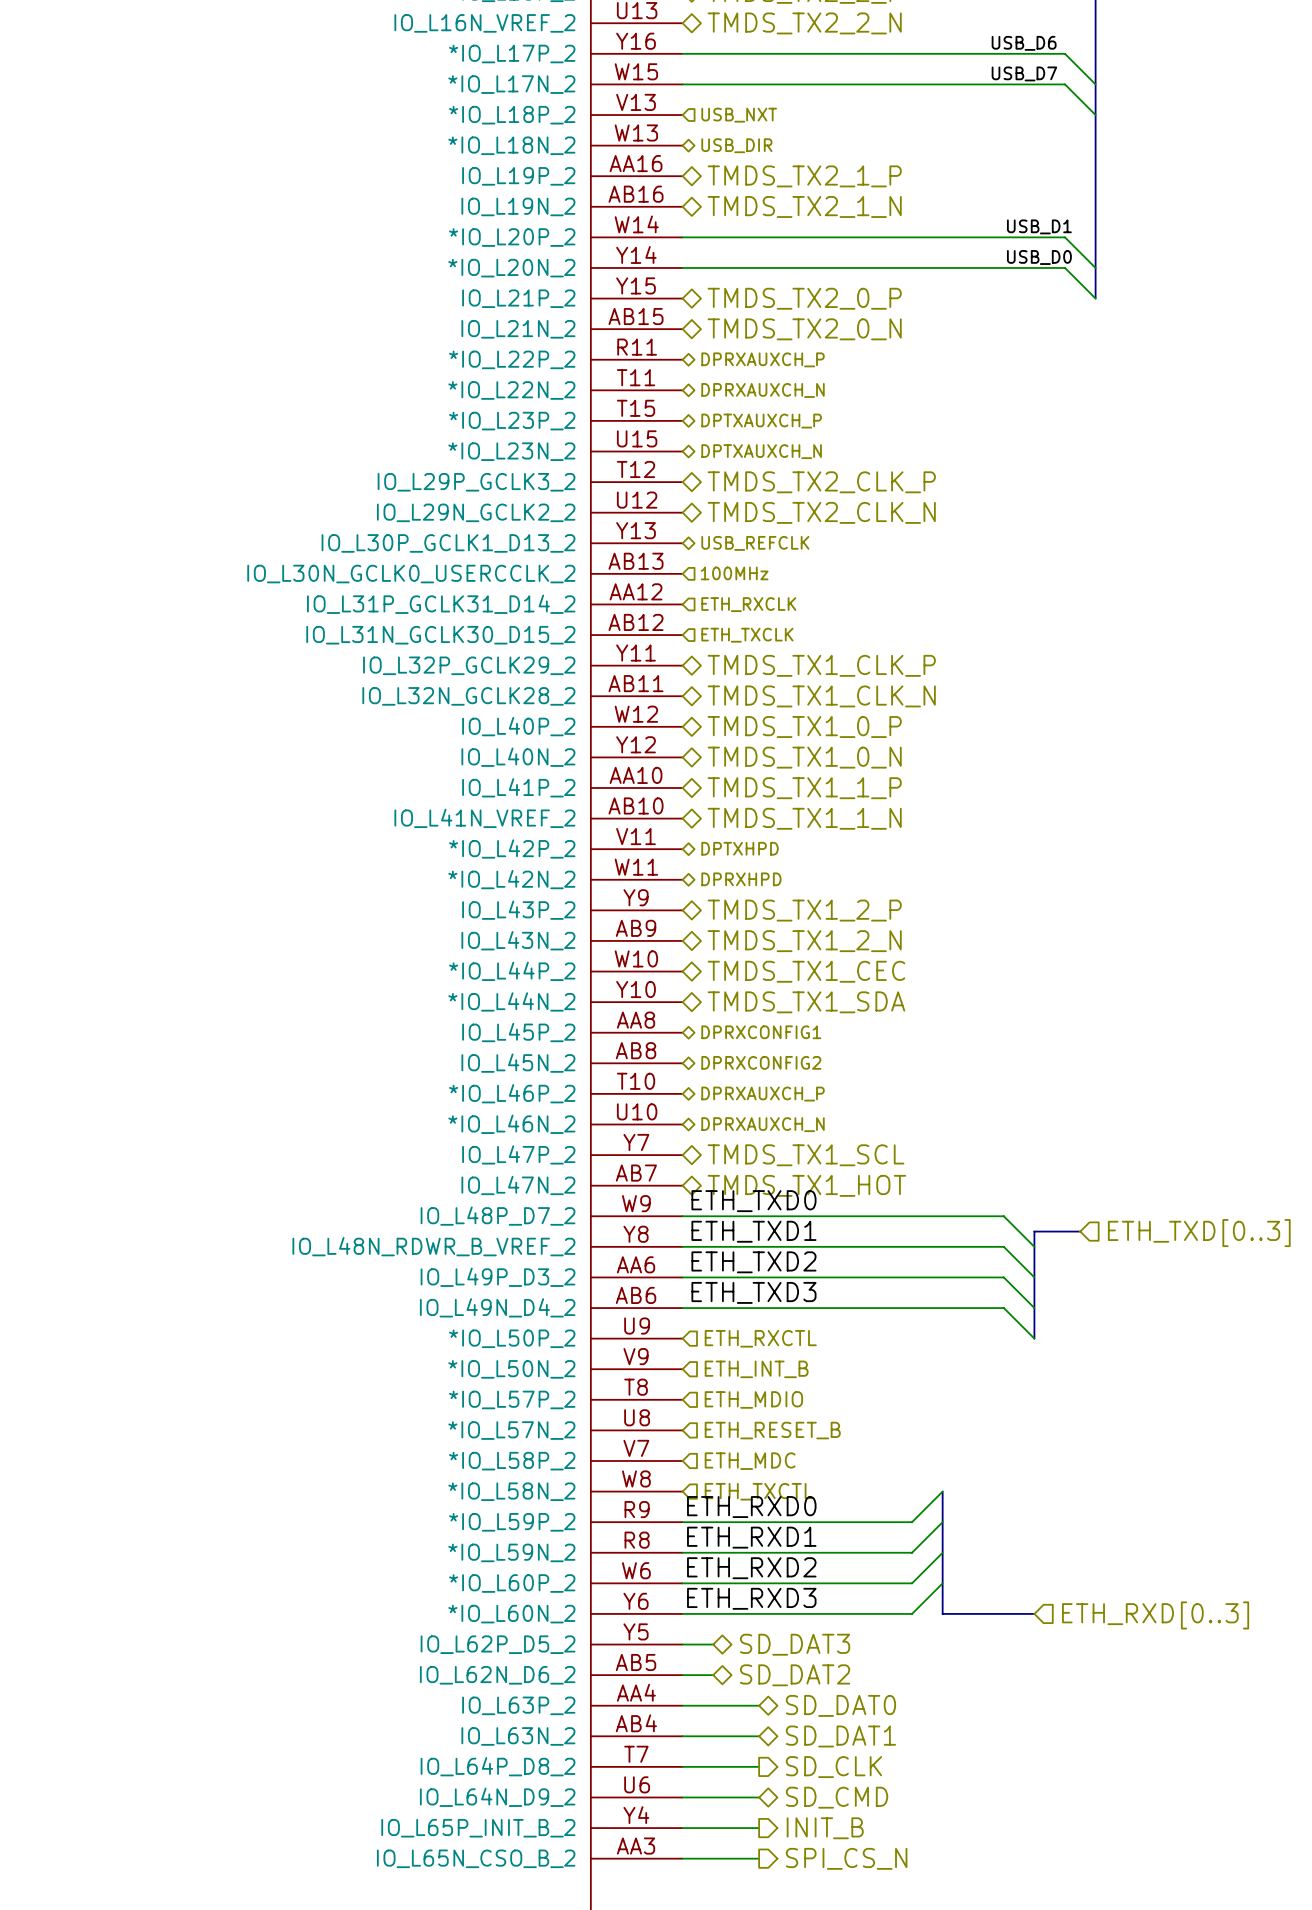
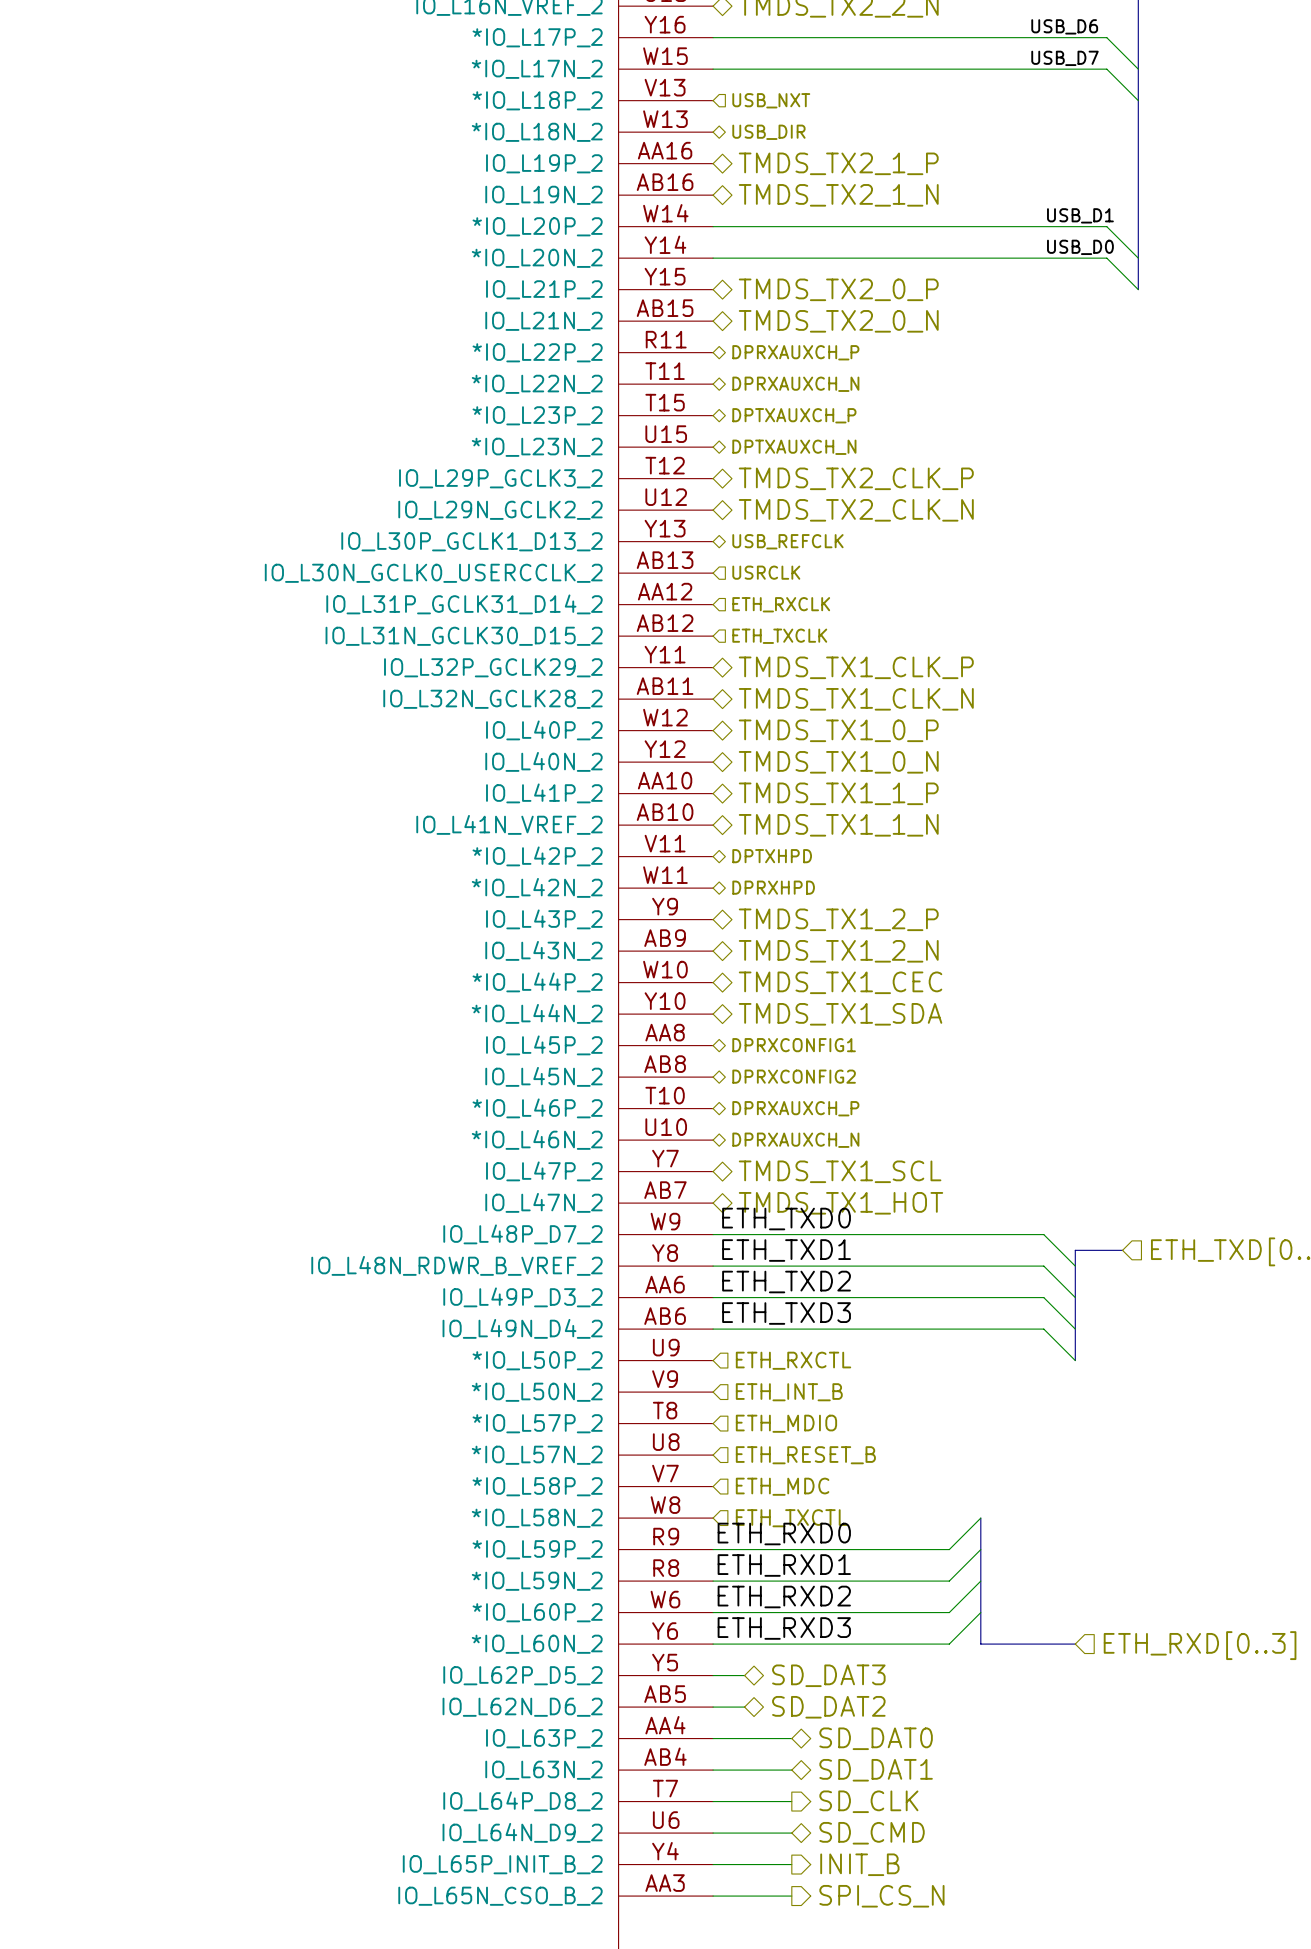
hierarchical label: 100MHz (734, 573) -> USRCLK (766, 572)

